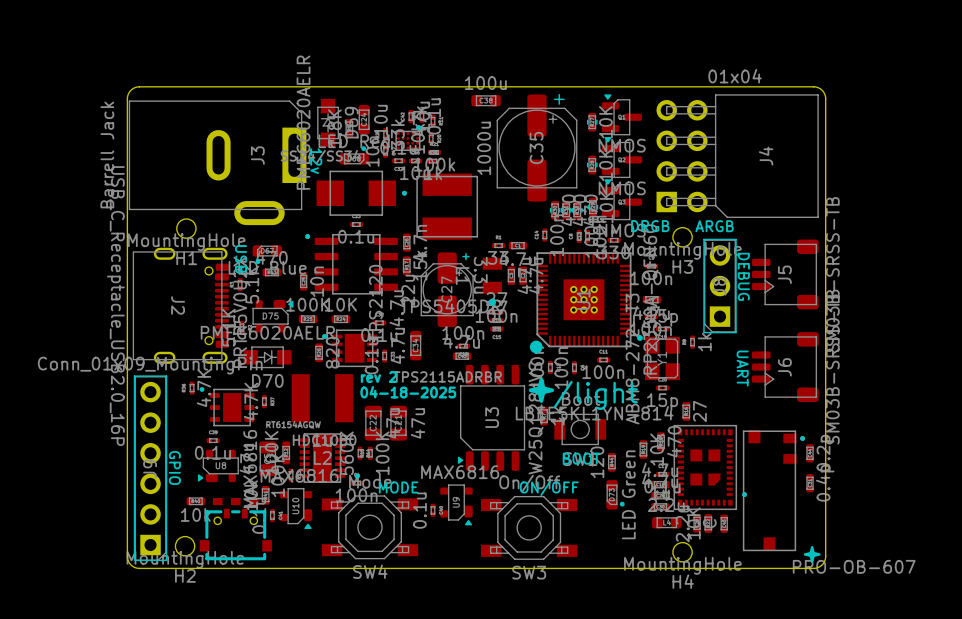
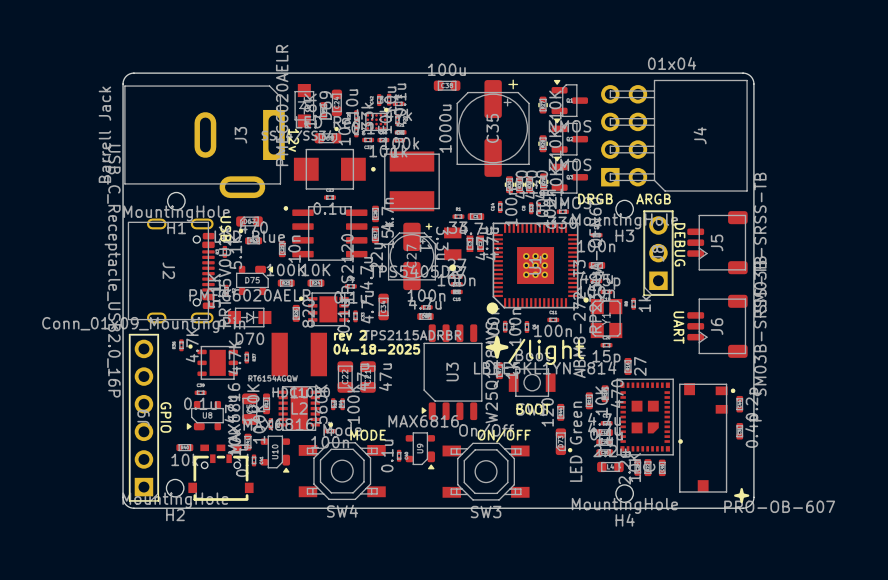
part rotation: 0° (432, 121) -> 90° clockwise (398, 103)

